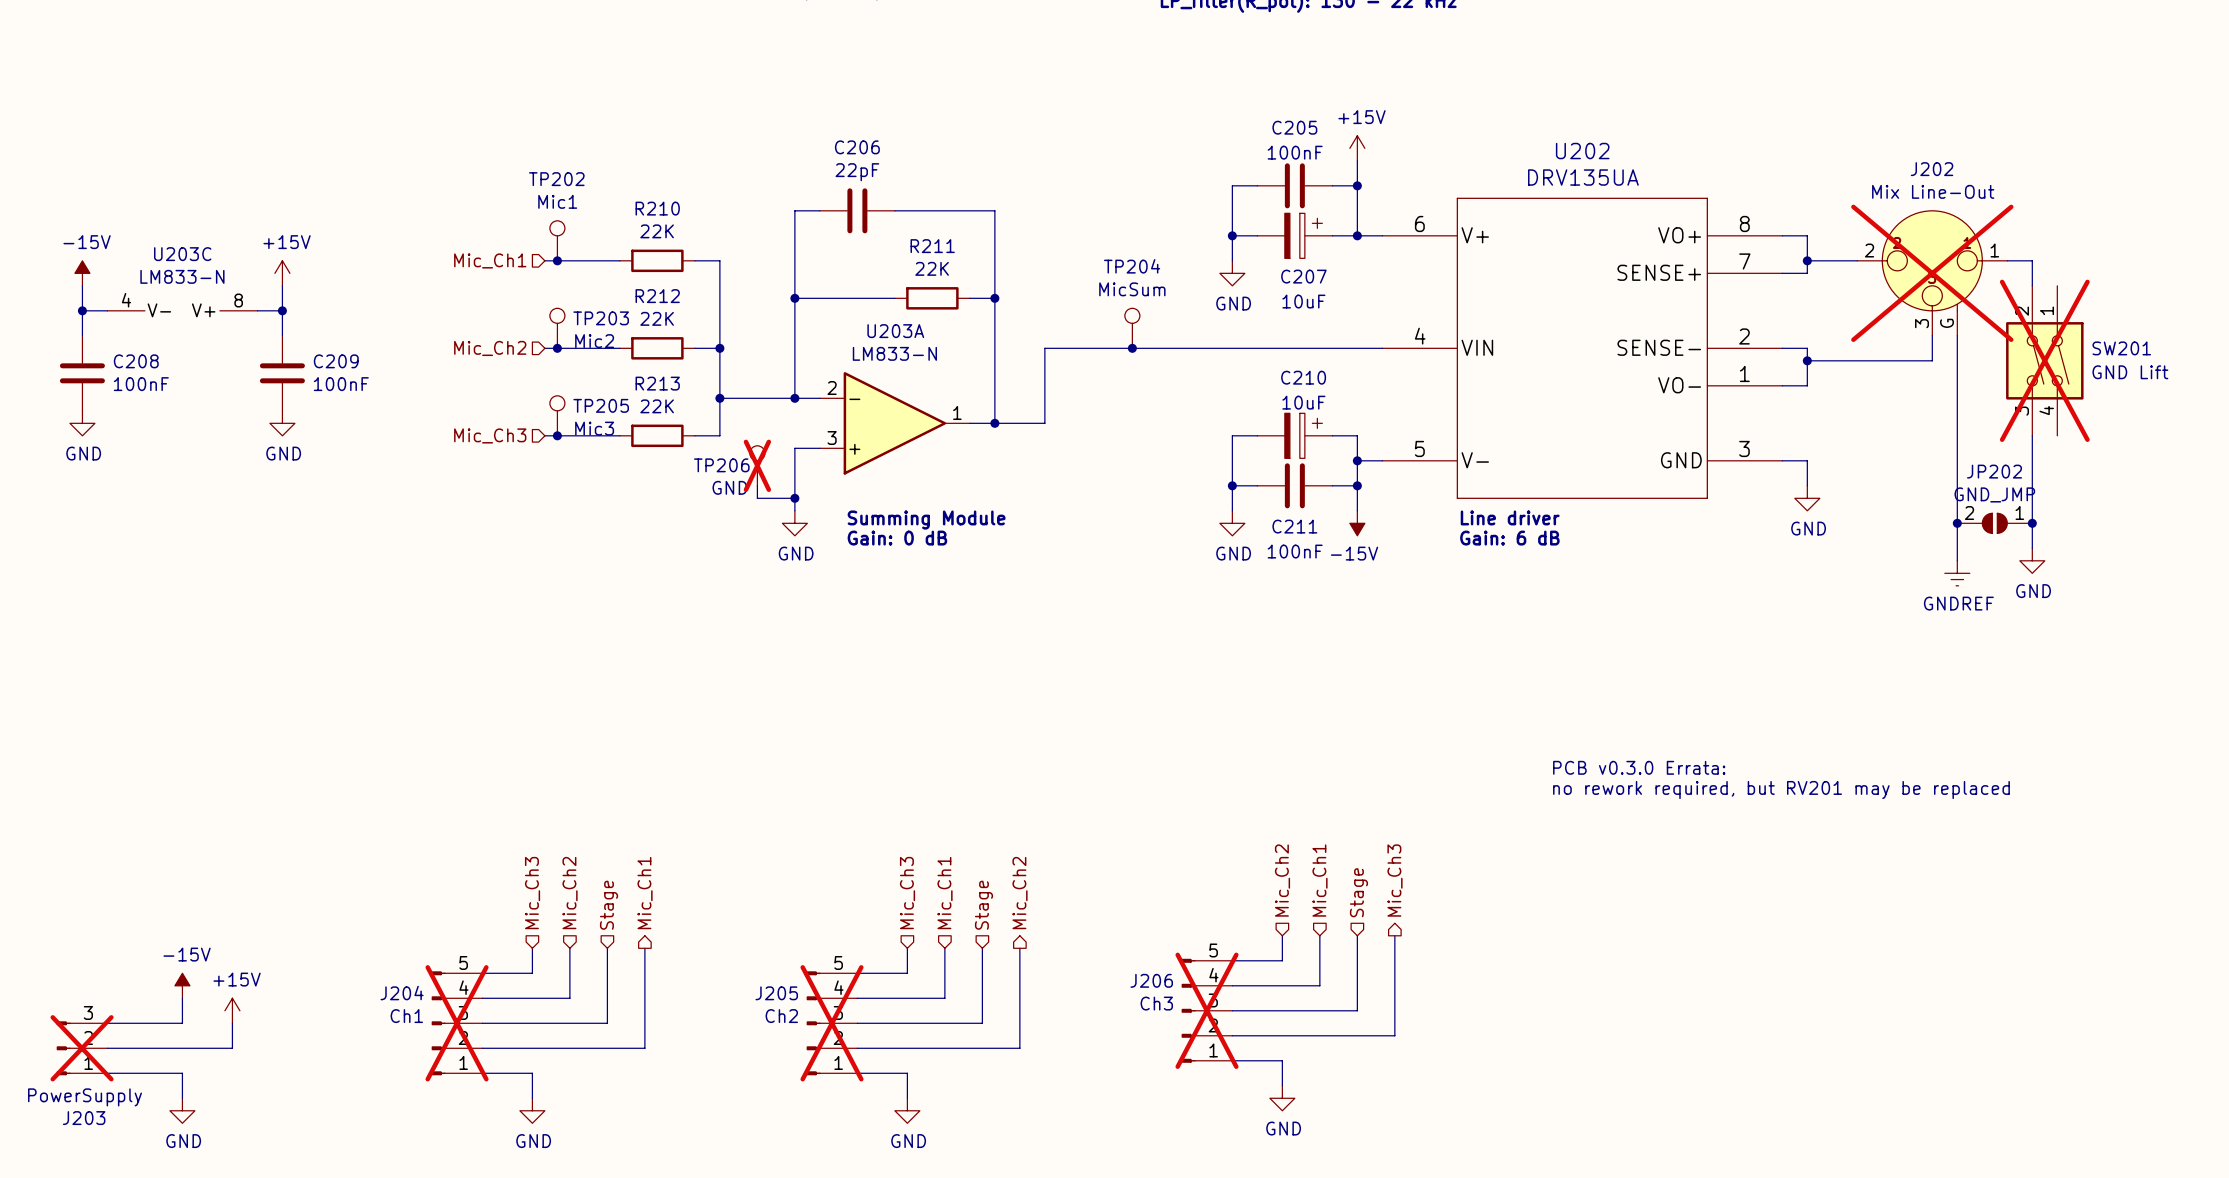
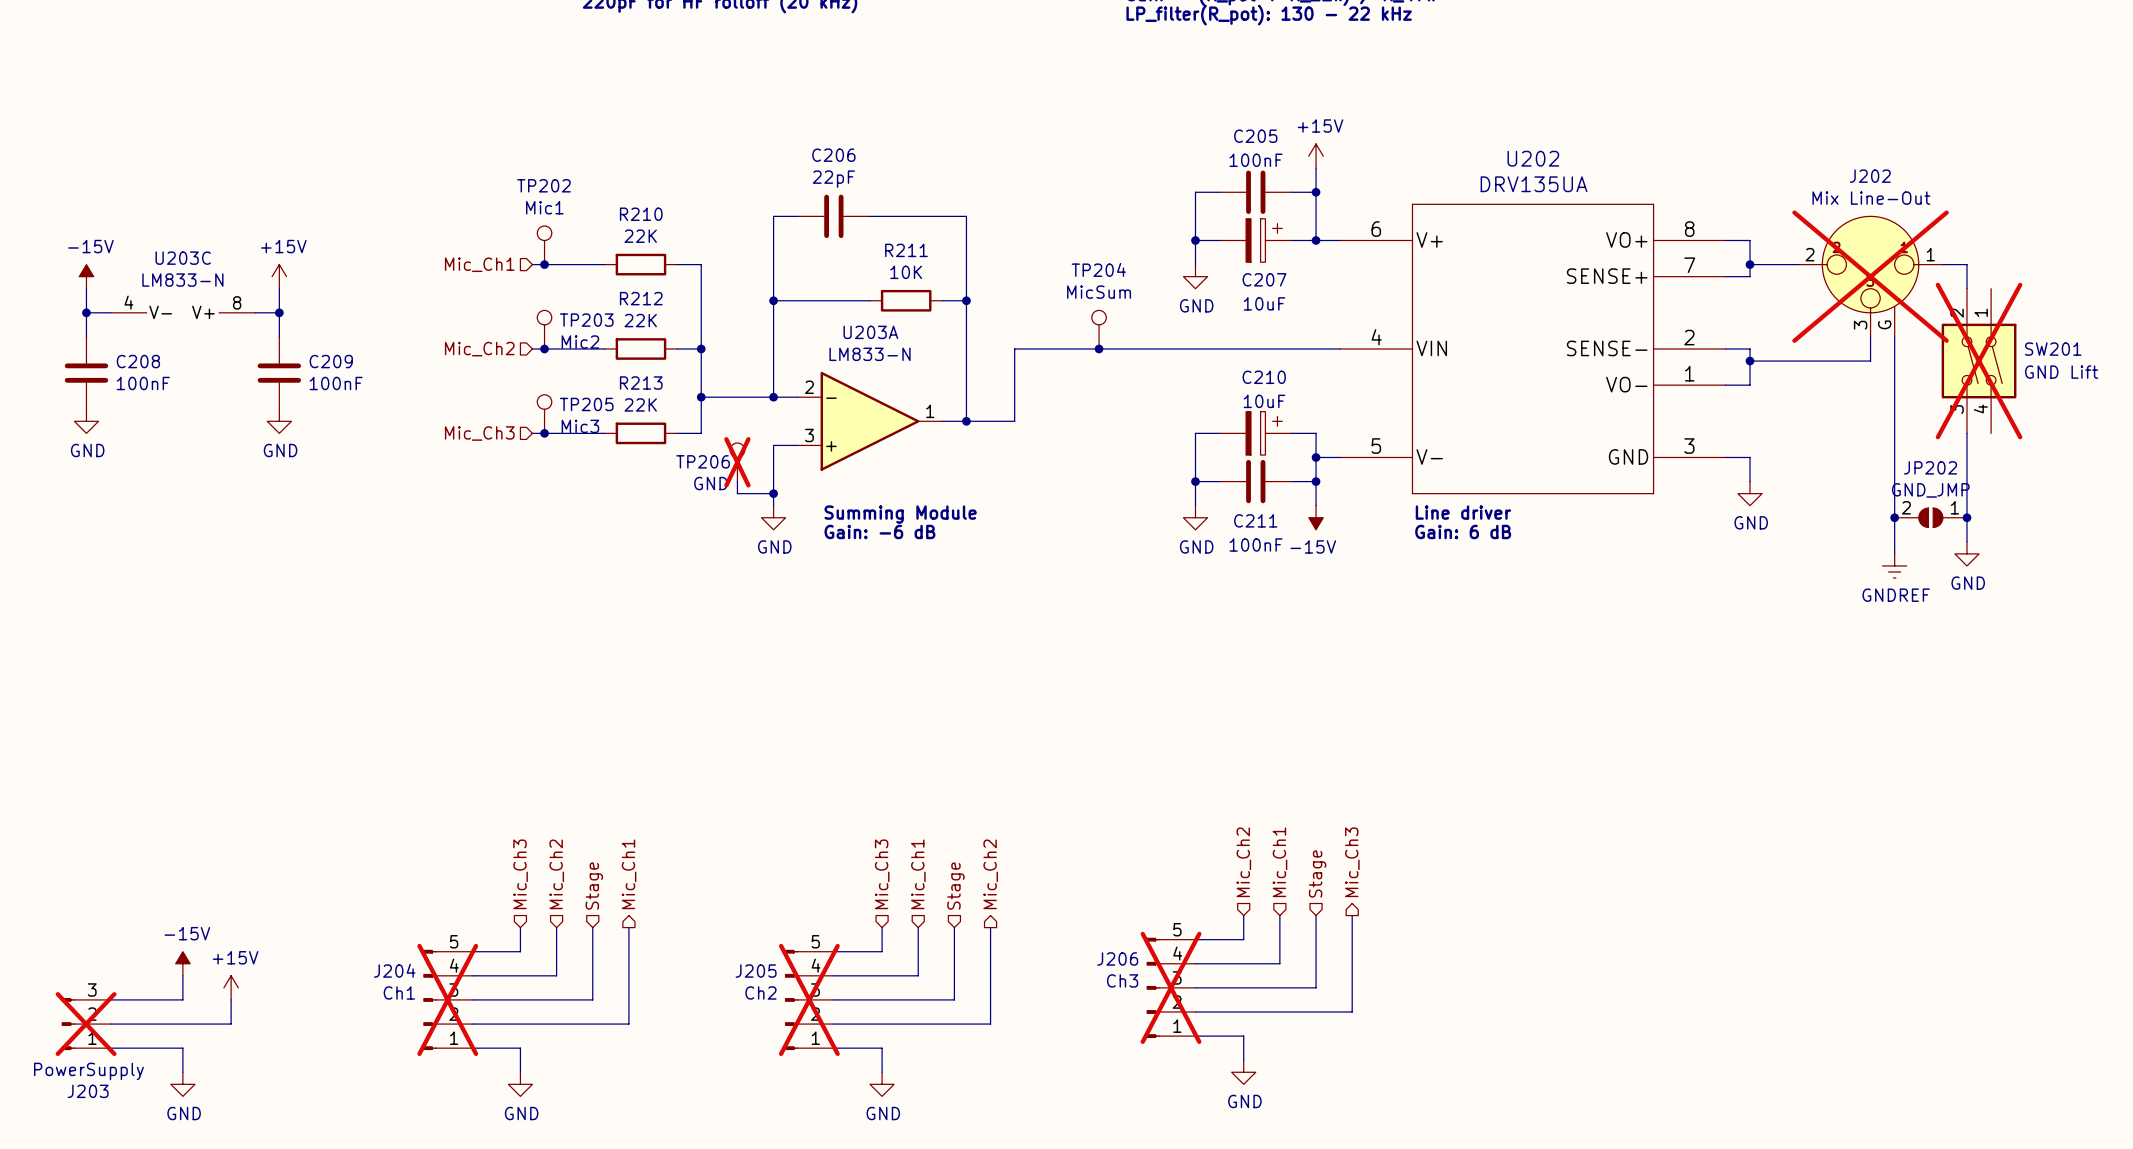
R211 value: 22K (932, 268) -> 10K (906, 272)
text: Gain: 0 dB (897, 538) -> Gain: -6 dB (879, 531)
text: PCB v0.3.0 Errata: (1639, 767) -> none
text: no rework required, but RV201 may be replaced (1781, 790) -> none

